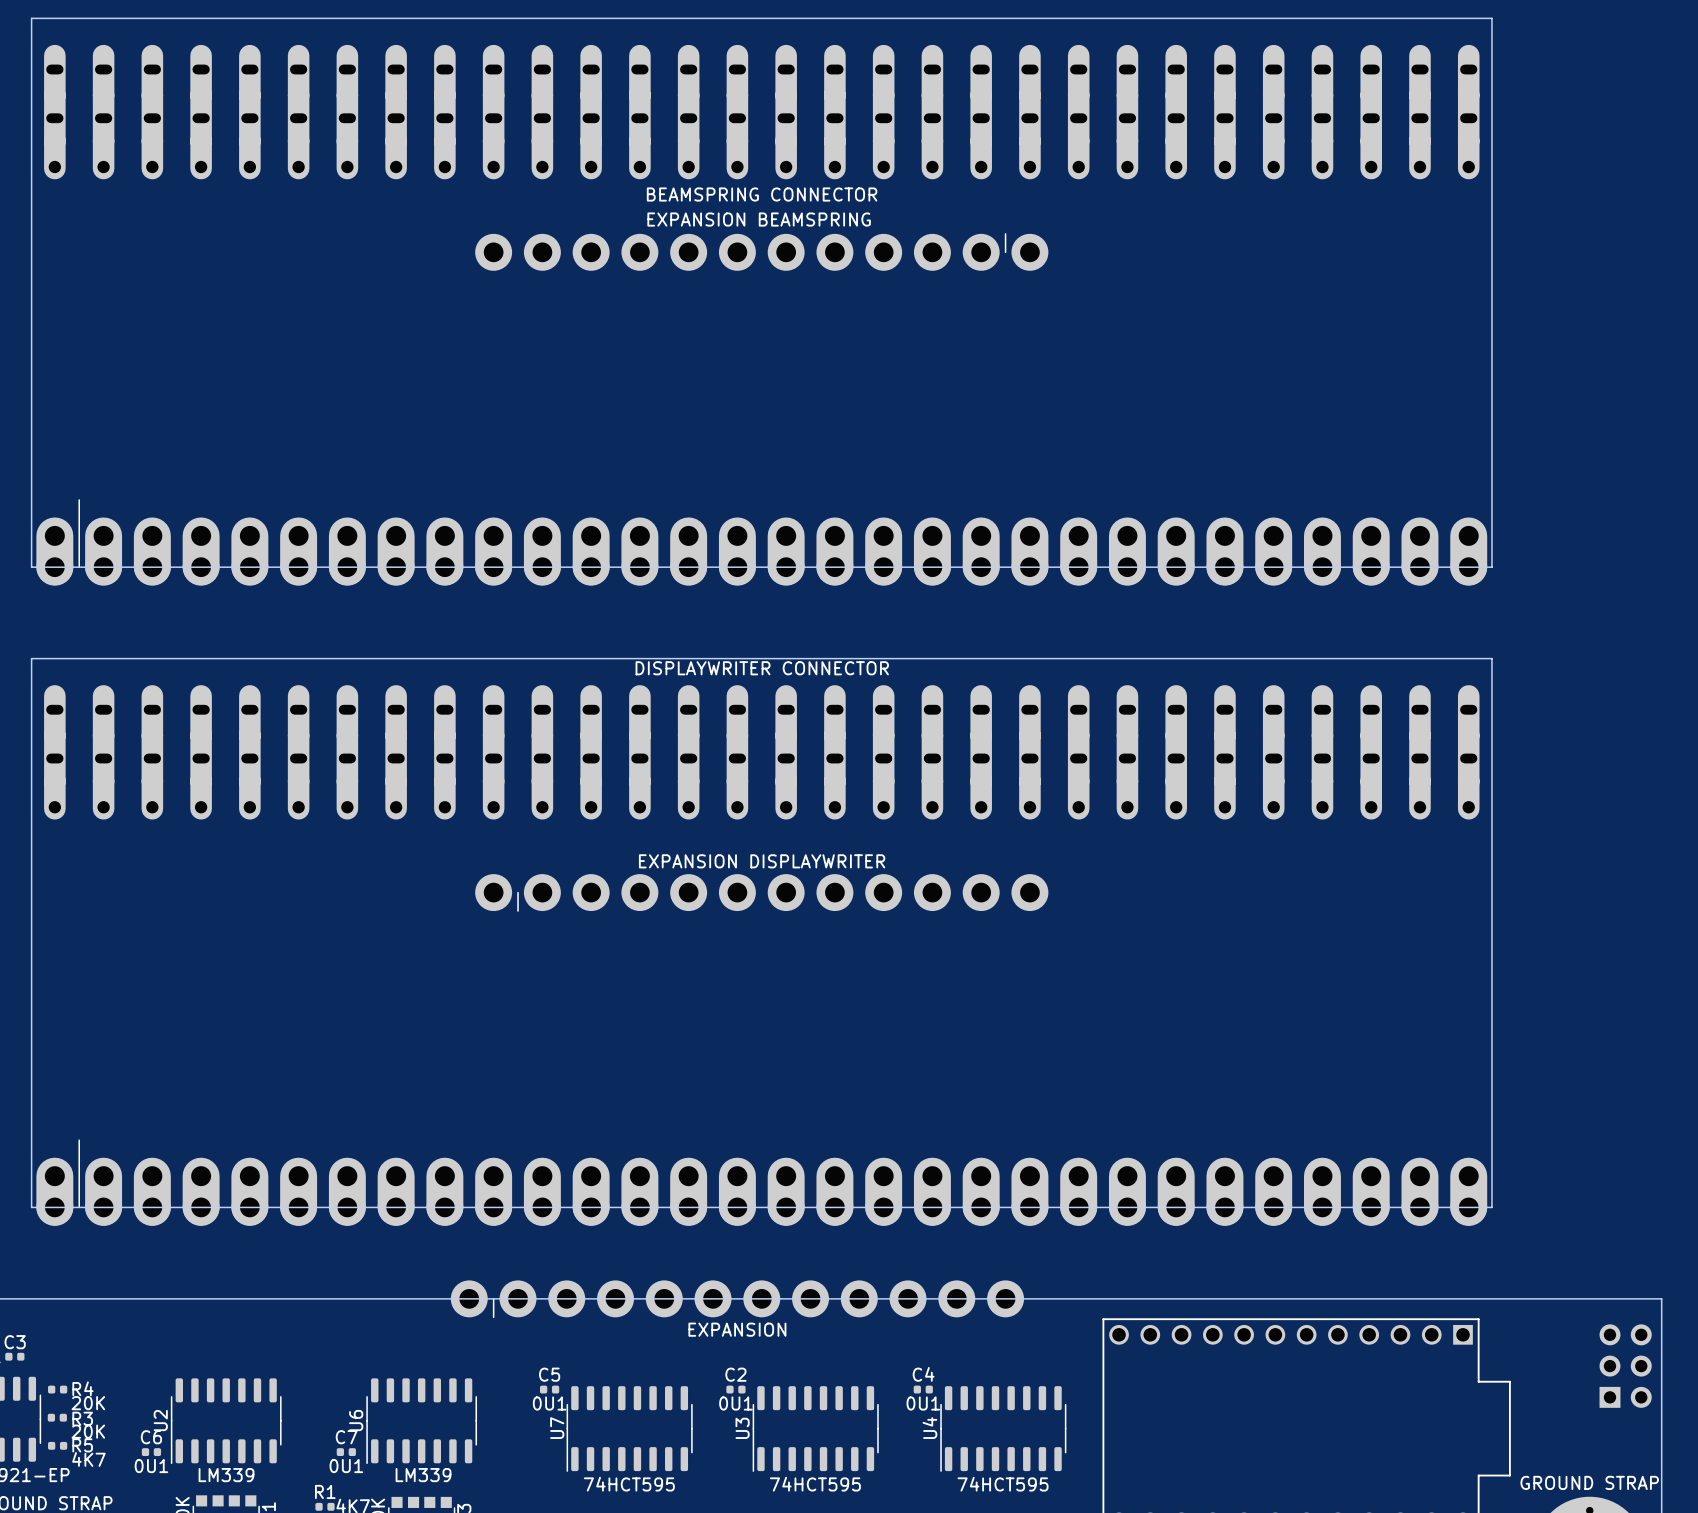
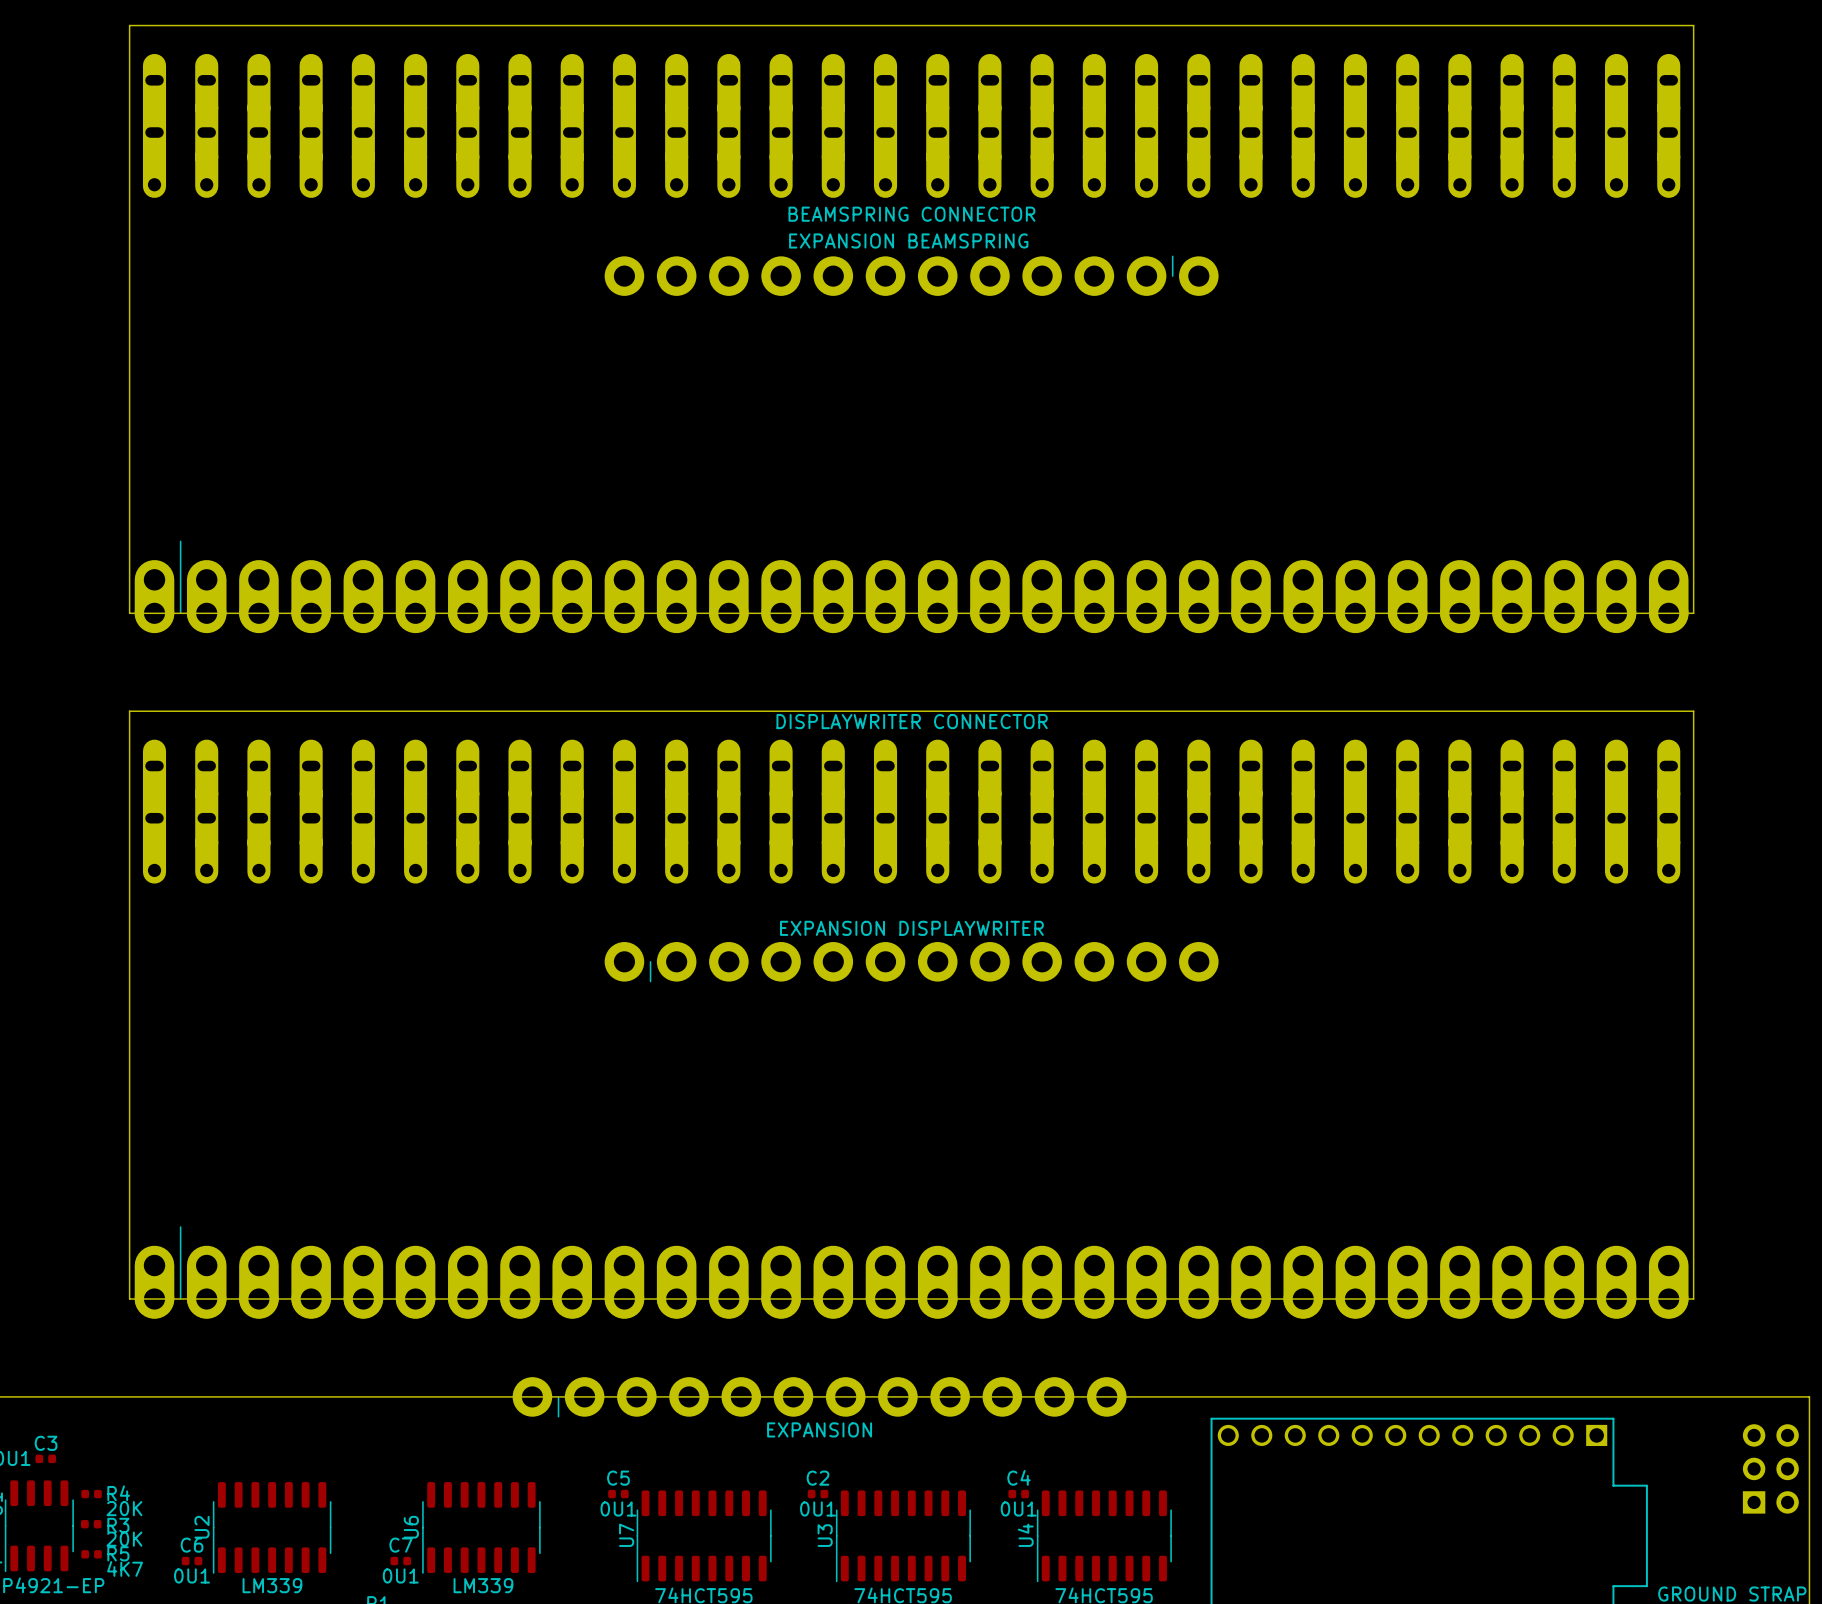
board edge: (93, 18) (31, 18) (31, 567) (93, 567) -> (129, 25) (129, 613)
board edge: (1491, 18) (1491, 567) -> (1627, 25) (1693, 25) (1693, 613) (1627, 613)
part position: (761, 112) -> (911, 125)
part position: (761, 251) -> (911, 275)
part position: (761, 542) -> (911, 586)
board edge: (93, 658) (31, 658) (31, 1207) (93, 1207) -> (129, 711) (129, 1299)
board edge: (1491, 658) (1491, 1207) -> (1627, 711) (1693, 711) (1693, 1299) (1627, 1299)
part position: (761, 752) -> (911, 811)
part position: (761, 892) -> (911, 962)
part position: (761, 1182) -> (911, 1272)

